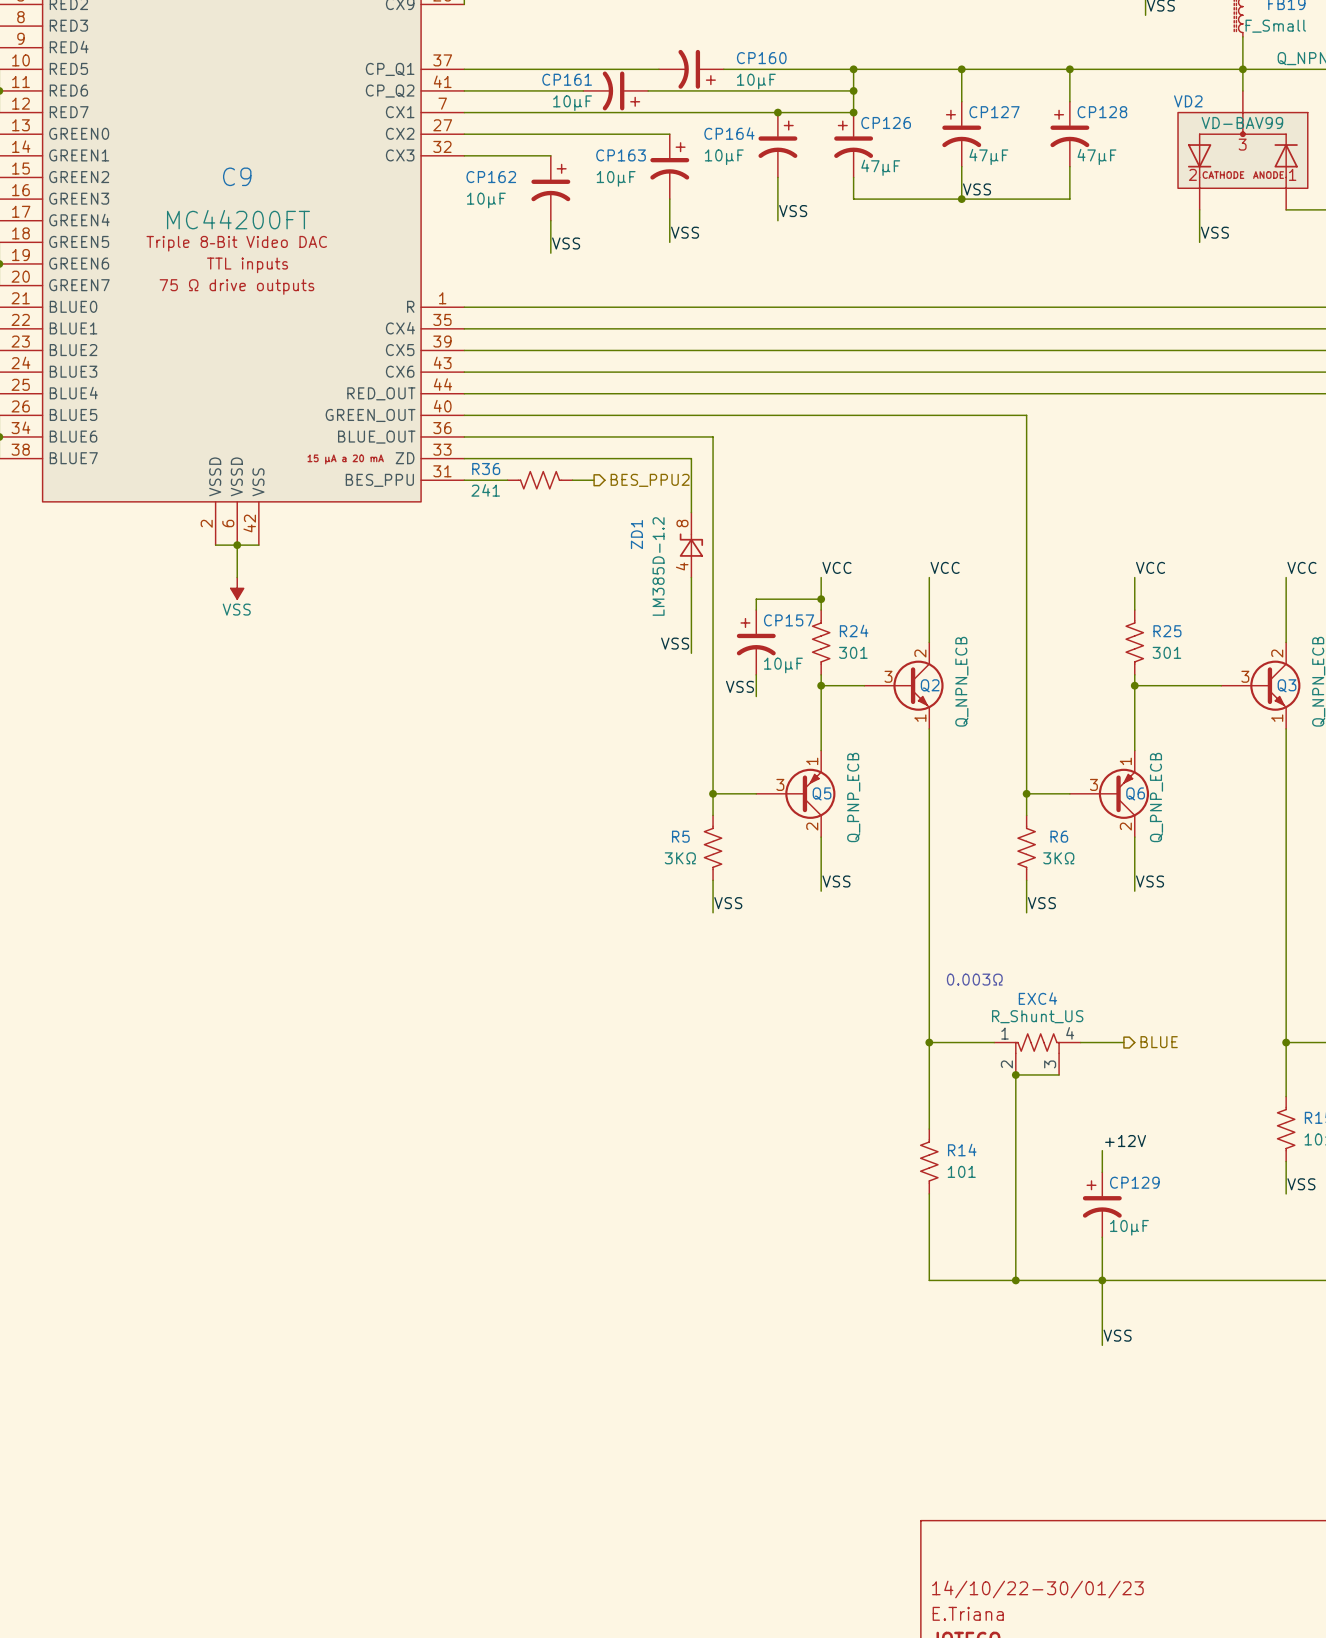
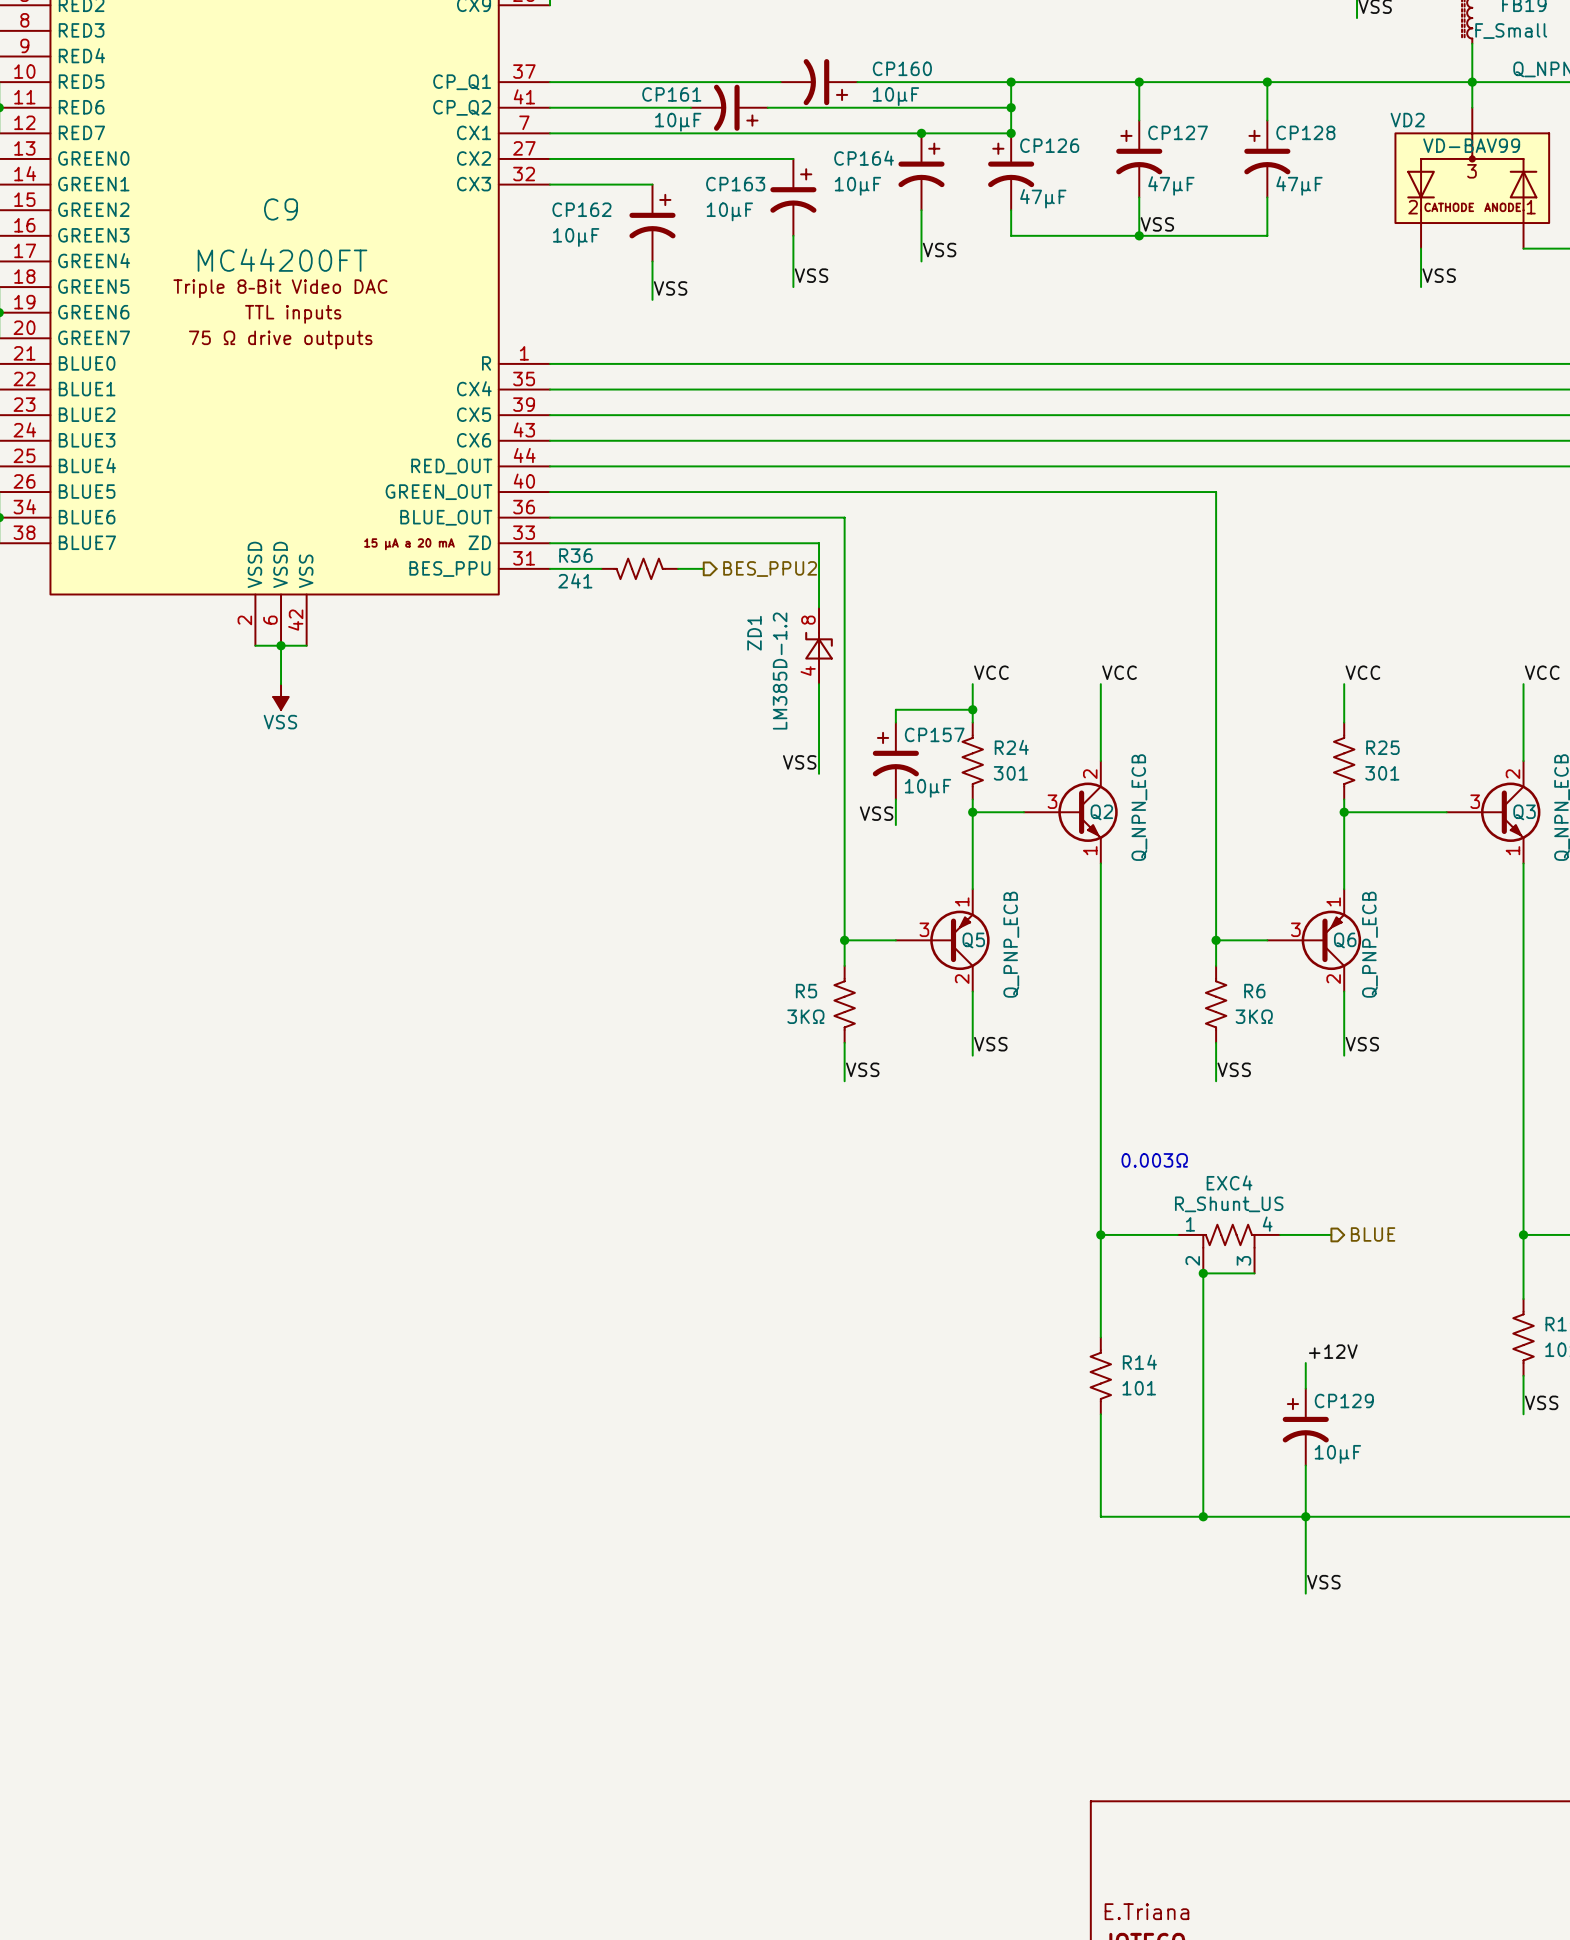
title block: 14/10/22-30/01/23 (1037, 1589) -> none

